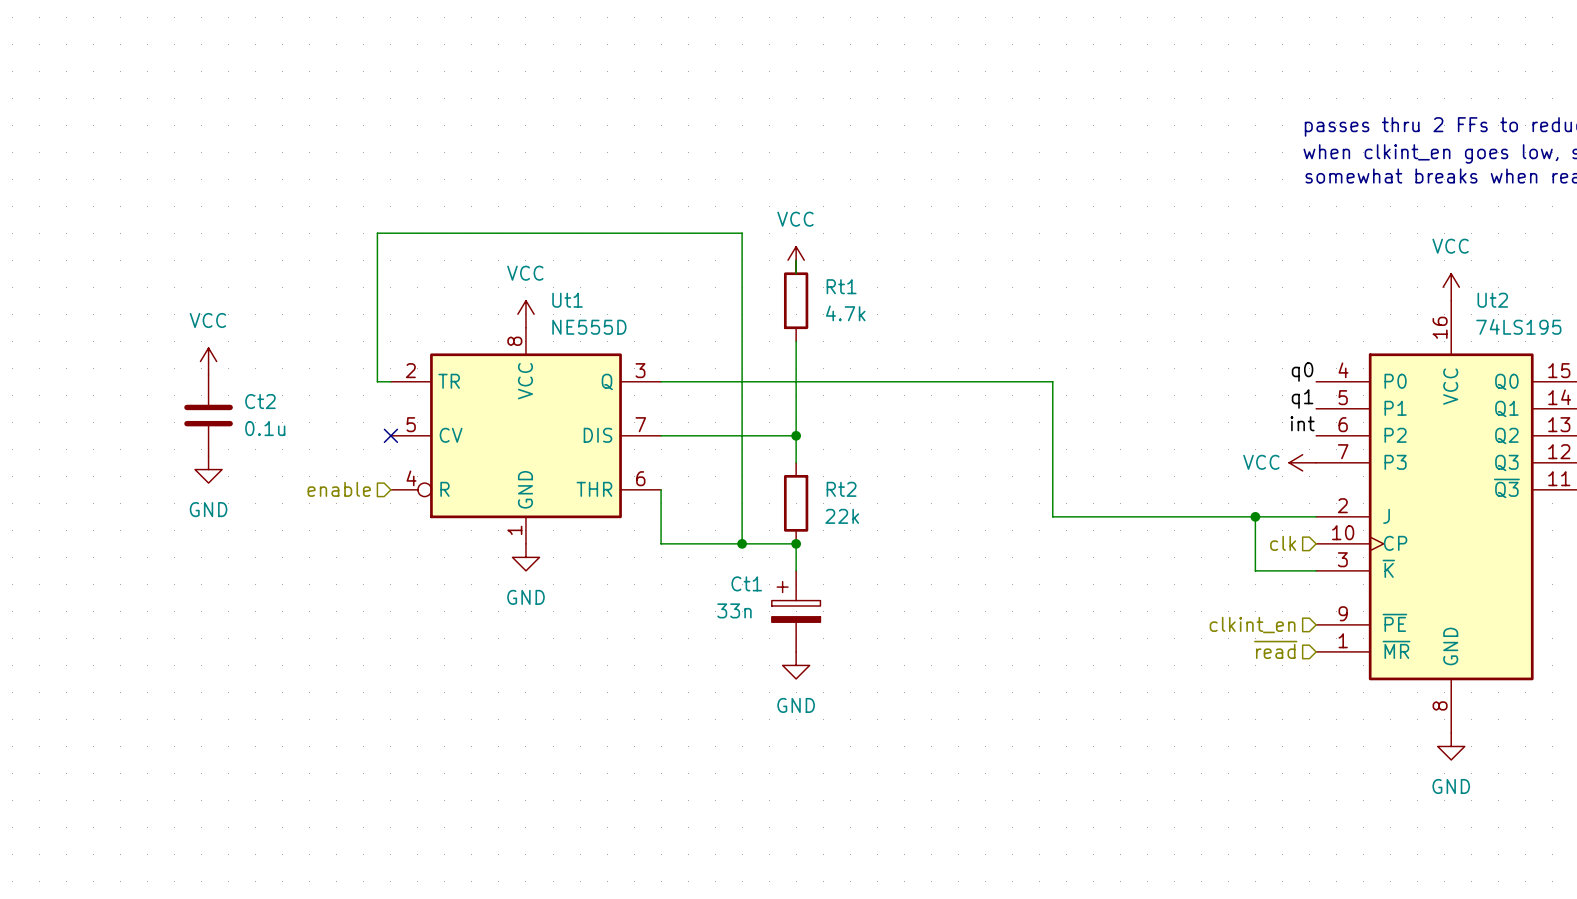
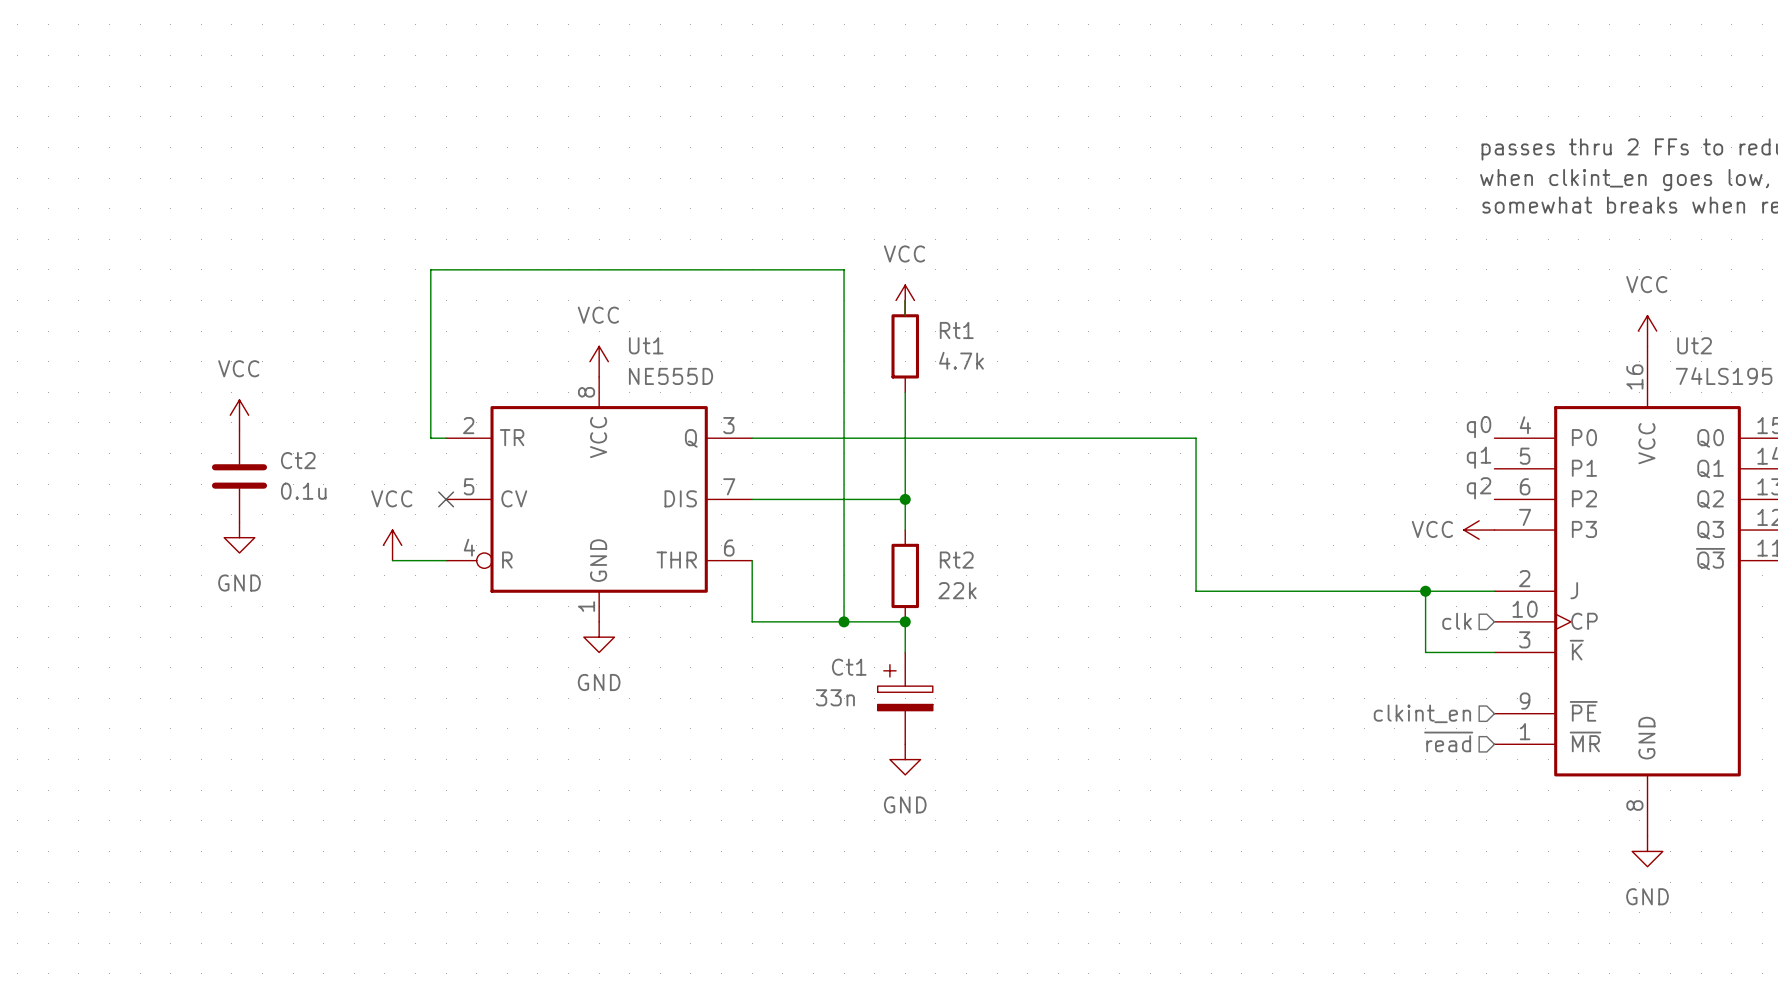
label: int (1302, 423) -> q2 (1479, 488)
power symbol: none -> VCC (392, 545)
hierarchical label: enable (339, 489) -> none
wire: none -> (392, 560) (446, 560)

